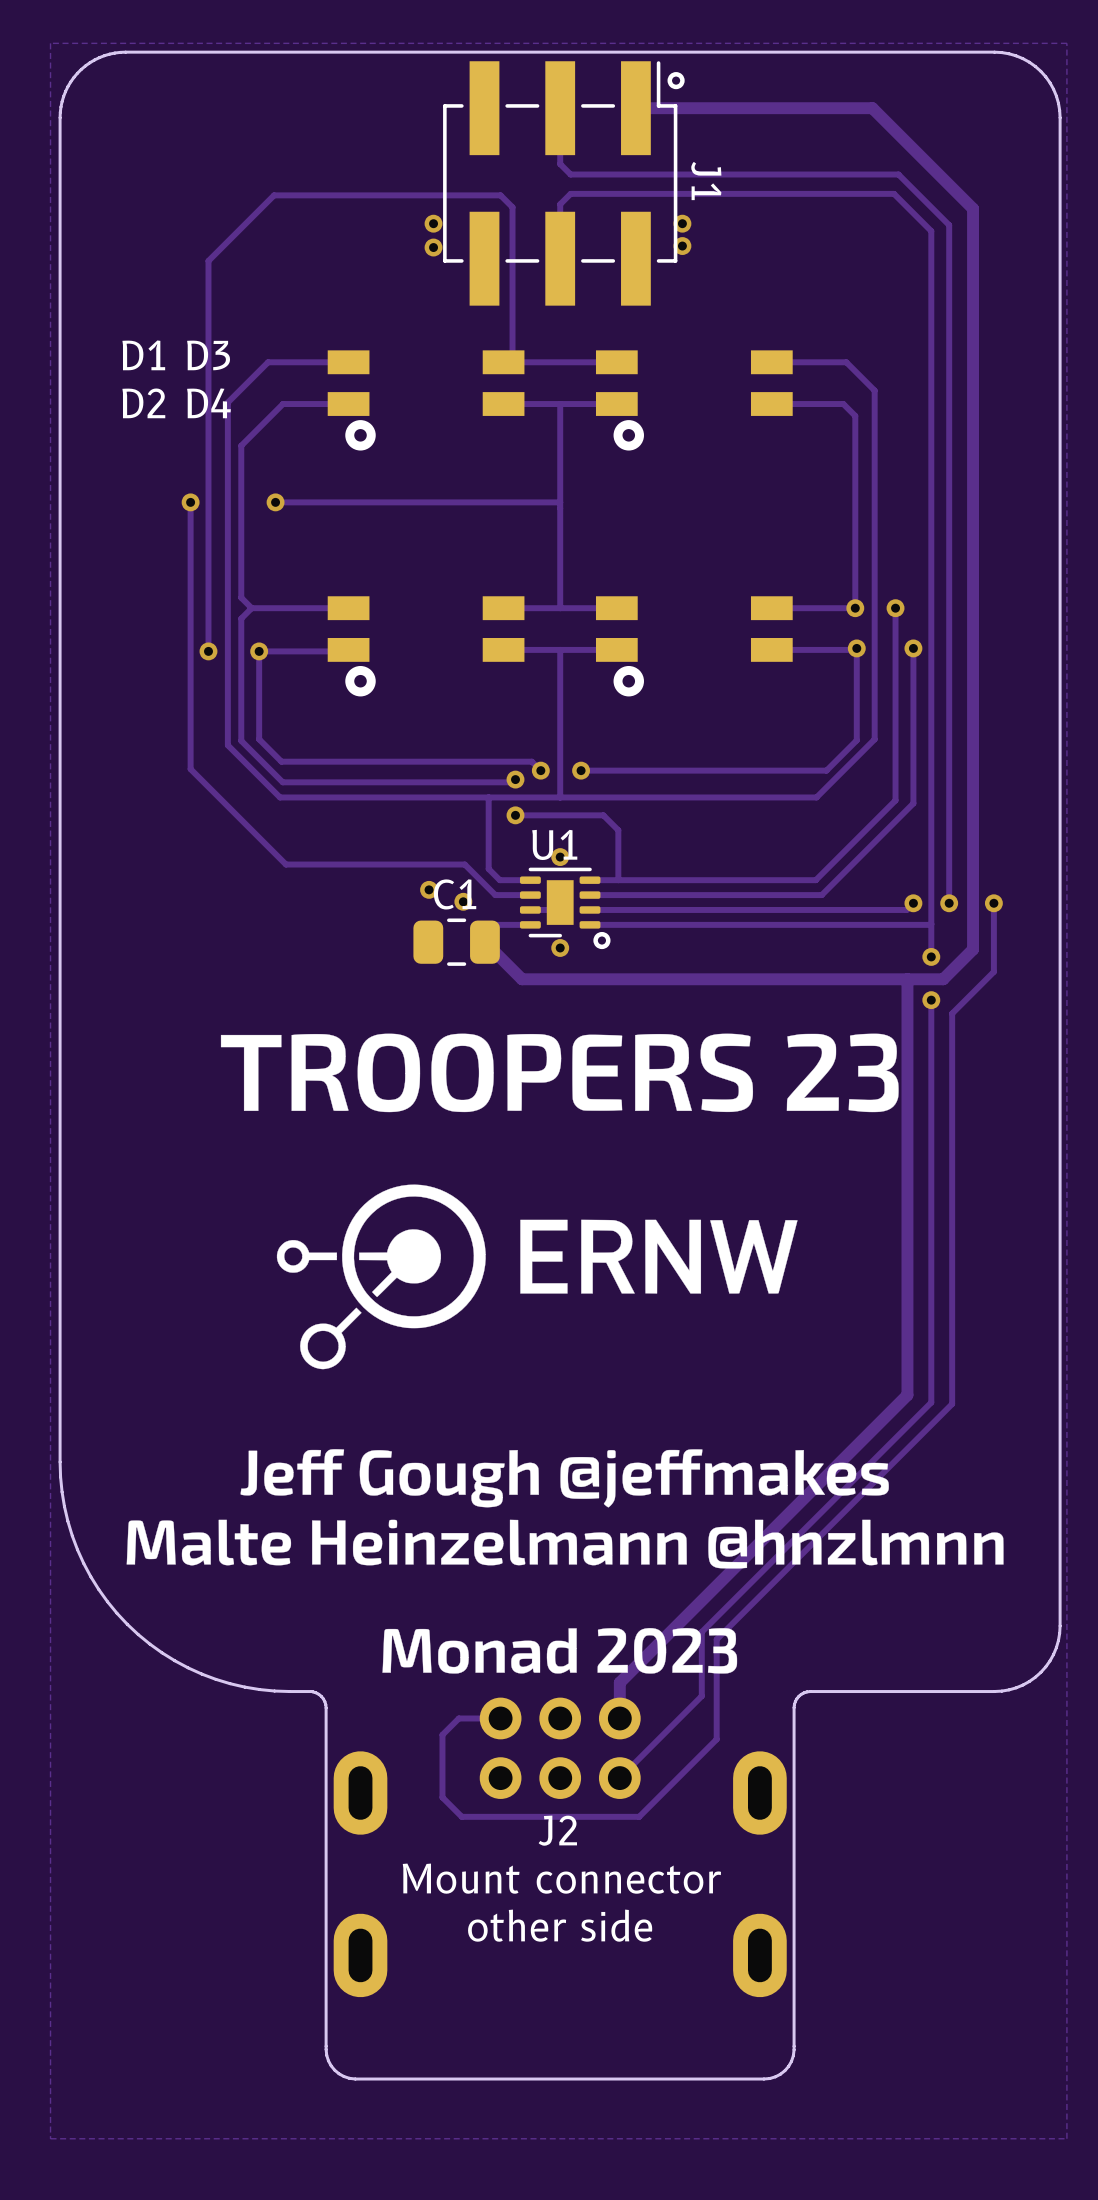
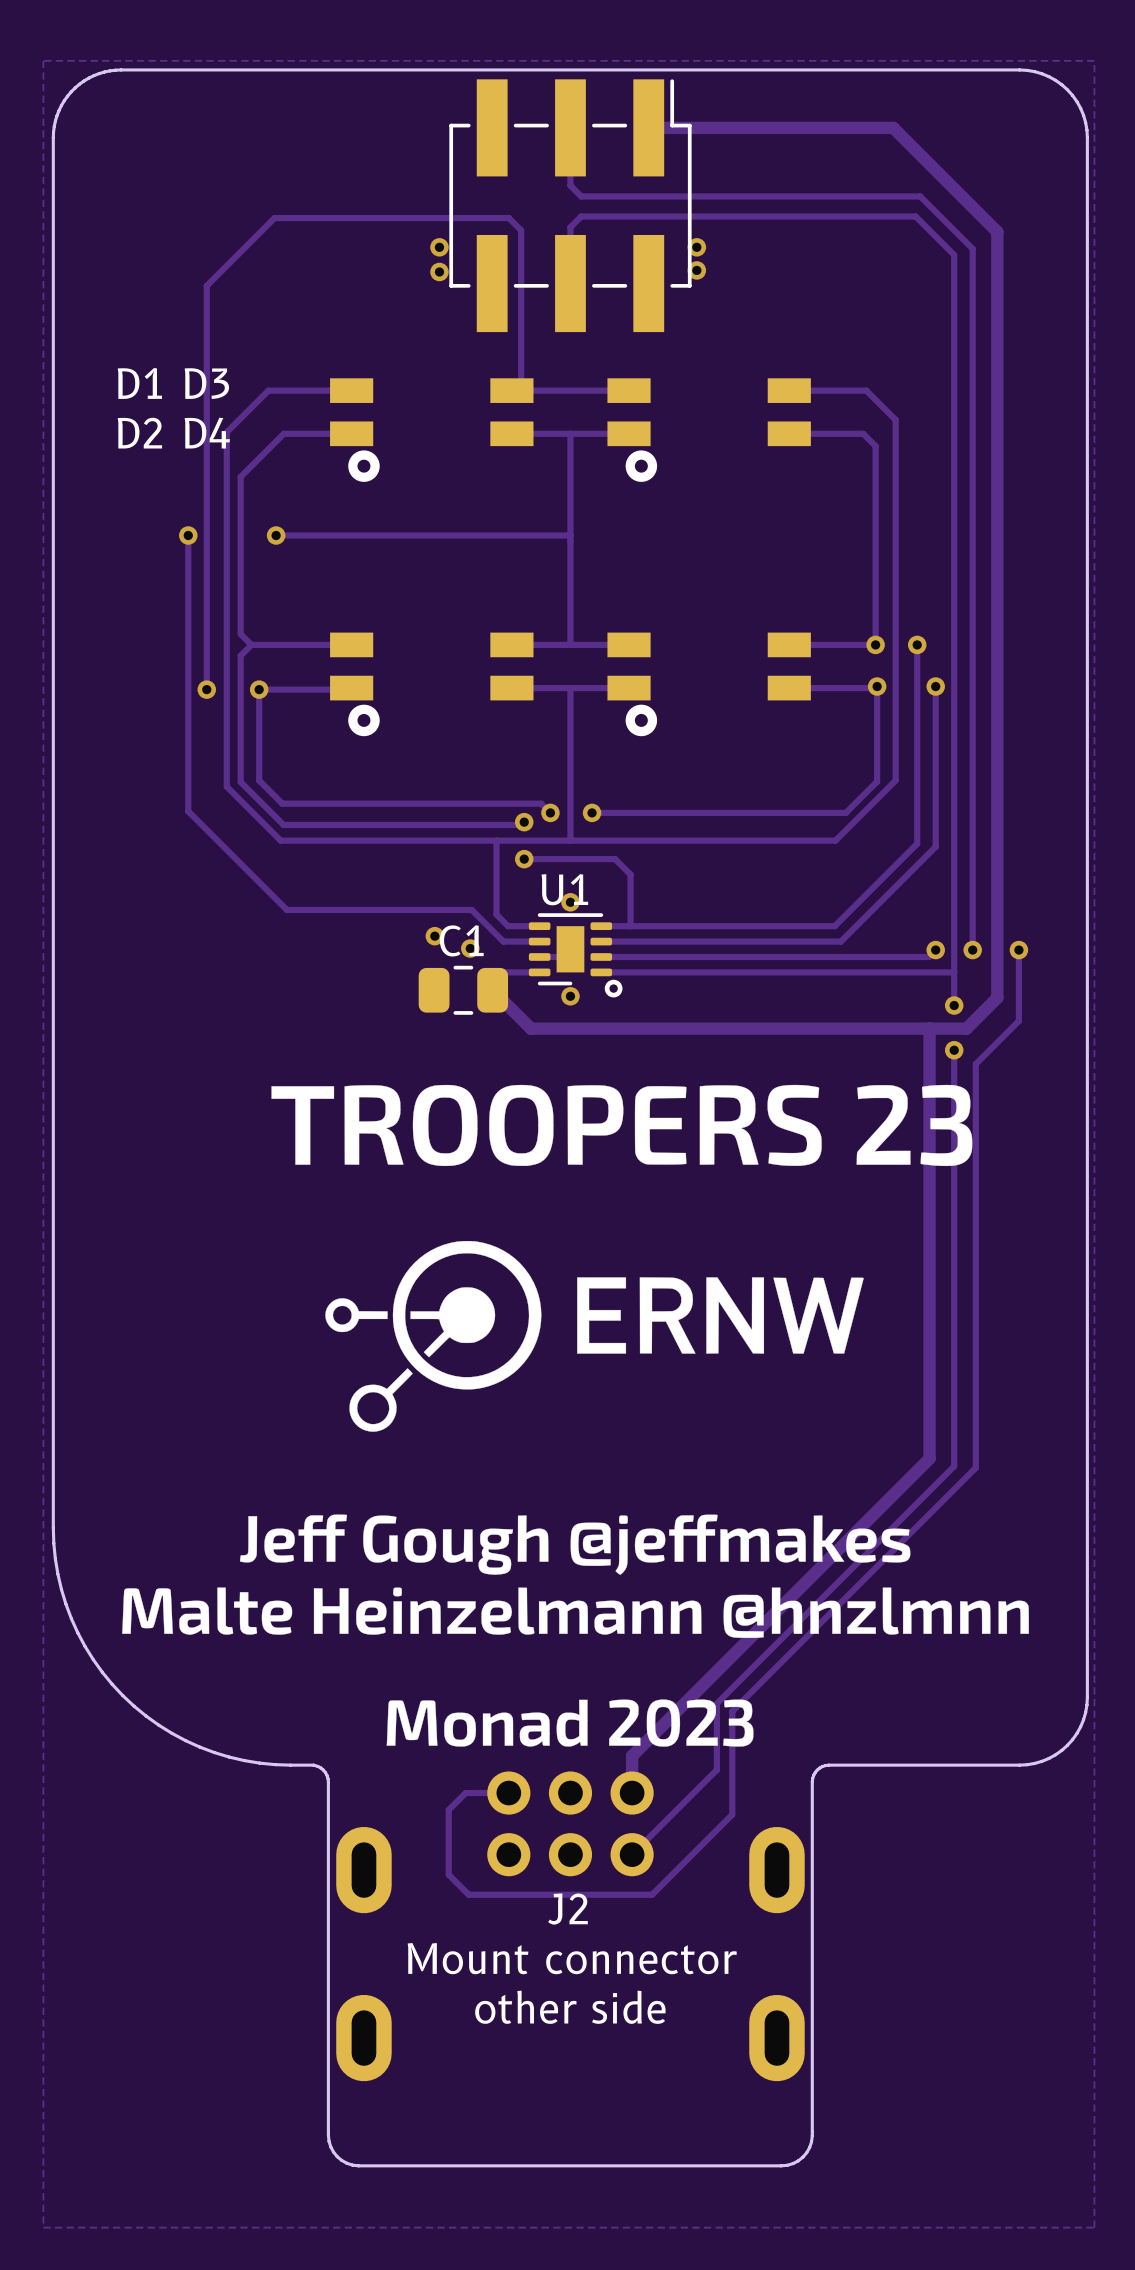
drawing shape: [58, 50, 1062, 2081] -> [51, 68, 1089, 2168]
drawing: [667, 72, 685, 90] -> none
J1 name: J1 (706, 180) -> none

